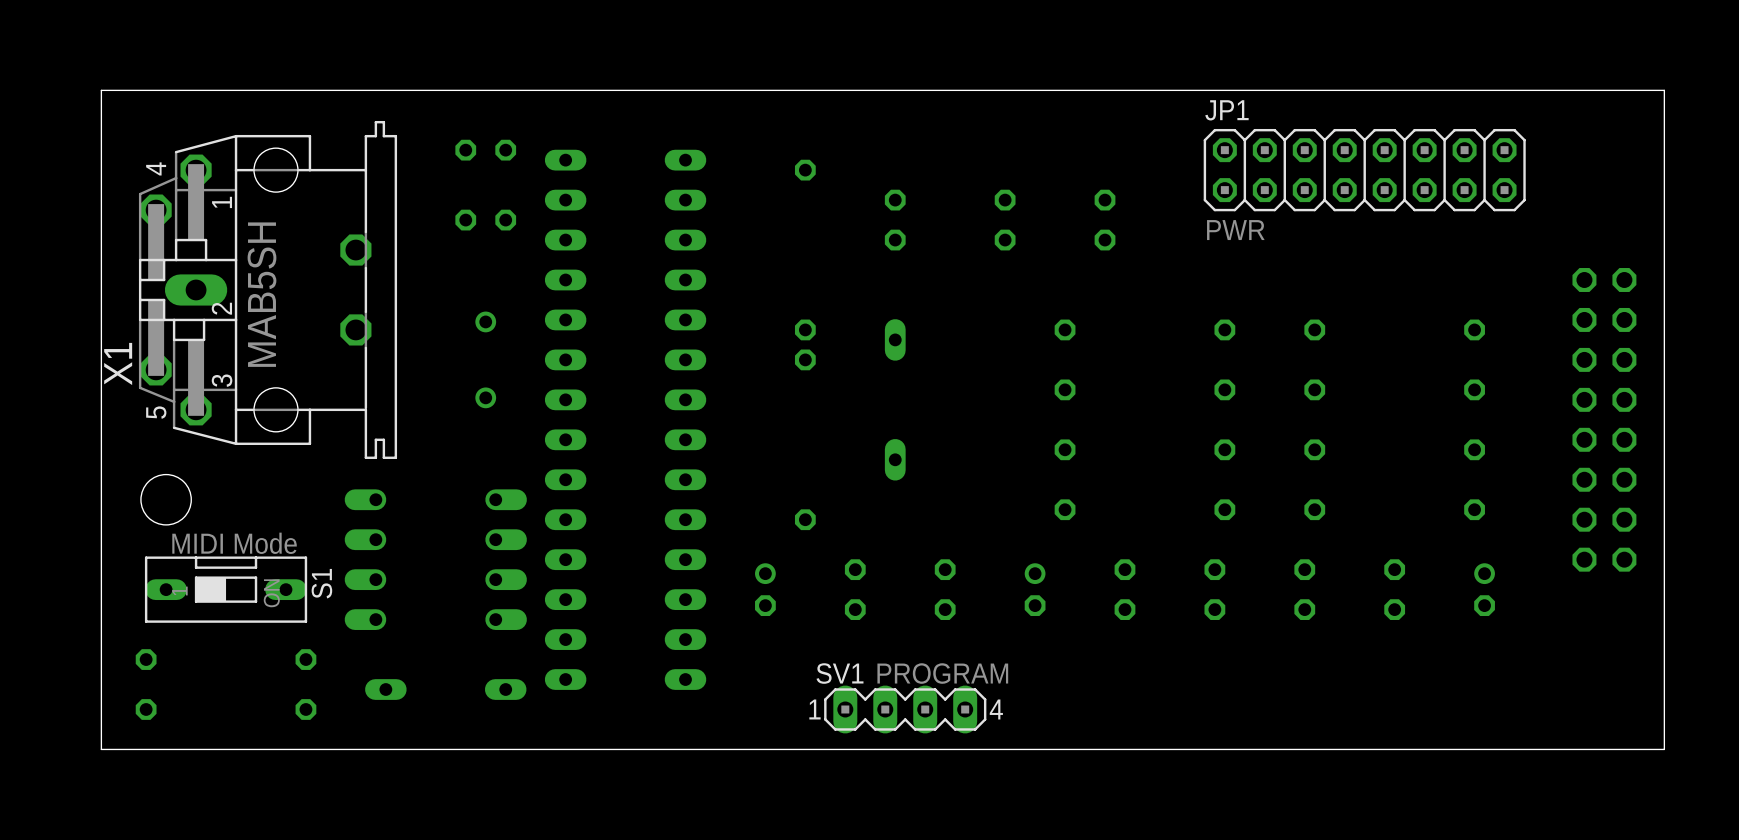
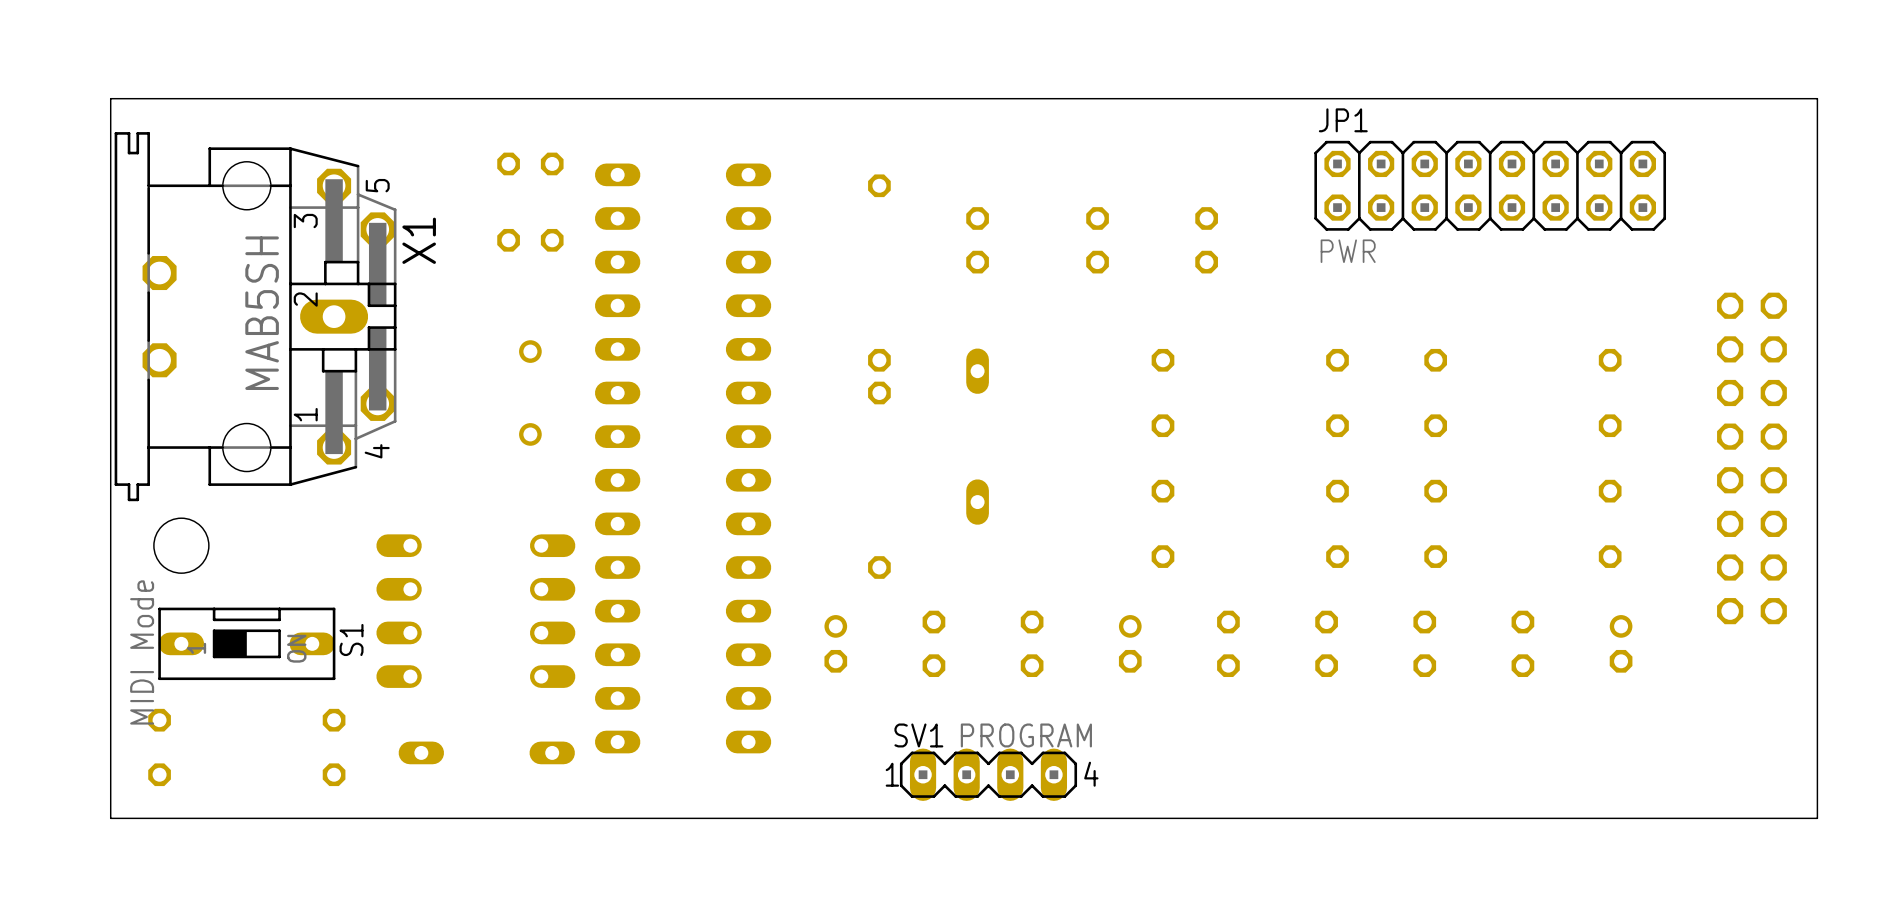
X1 footprint: [138, 120, 398, 459] -> [114, 132, 397, 502]
X1 name position: X1 (118, 363) -> X1 (419, 240)
S1 value rotation: 0° (234, 543) -> 90° counterclockwise (142, 652)

